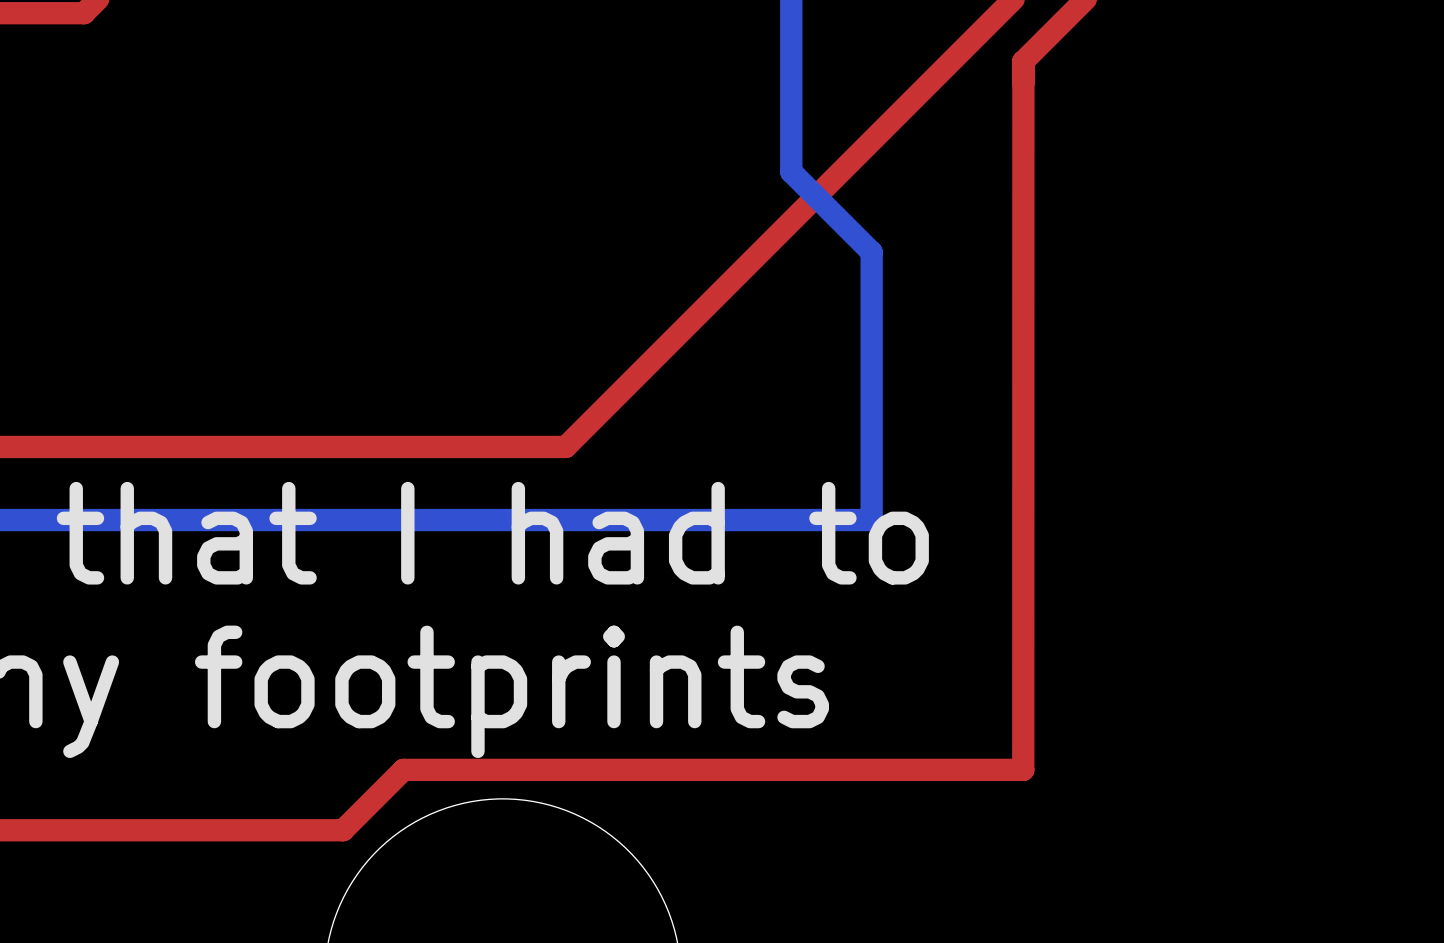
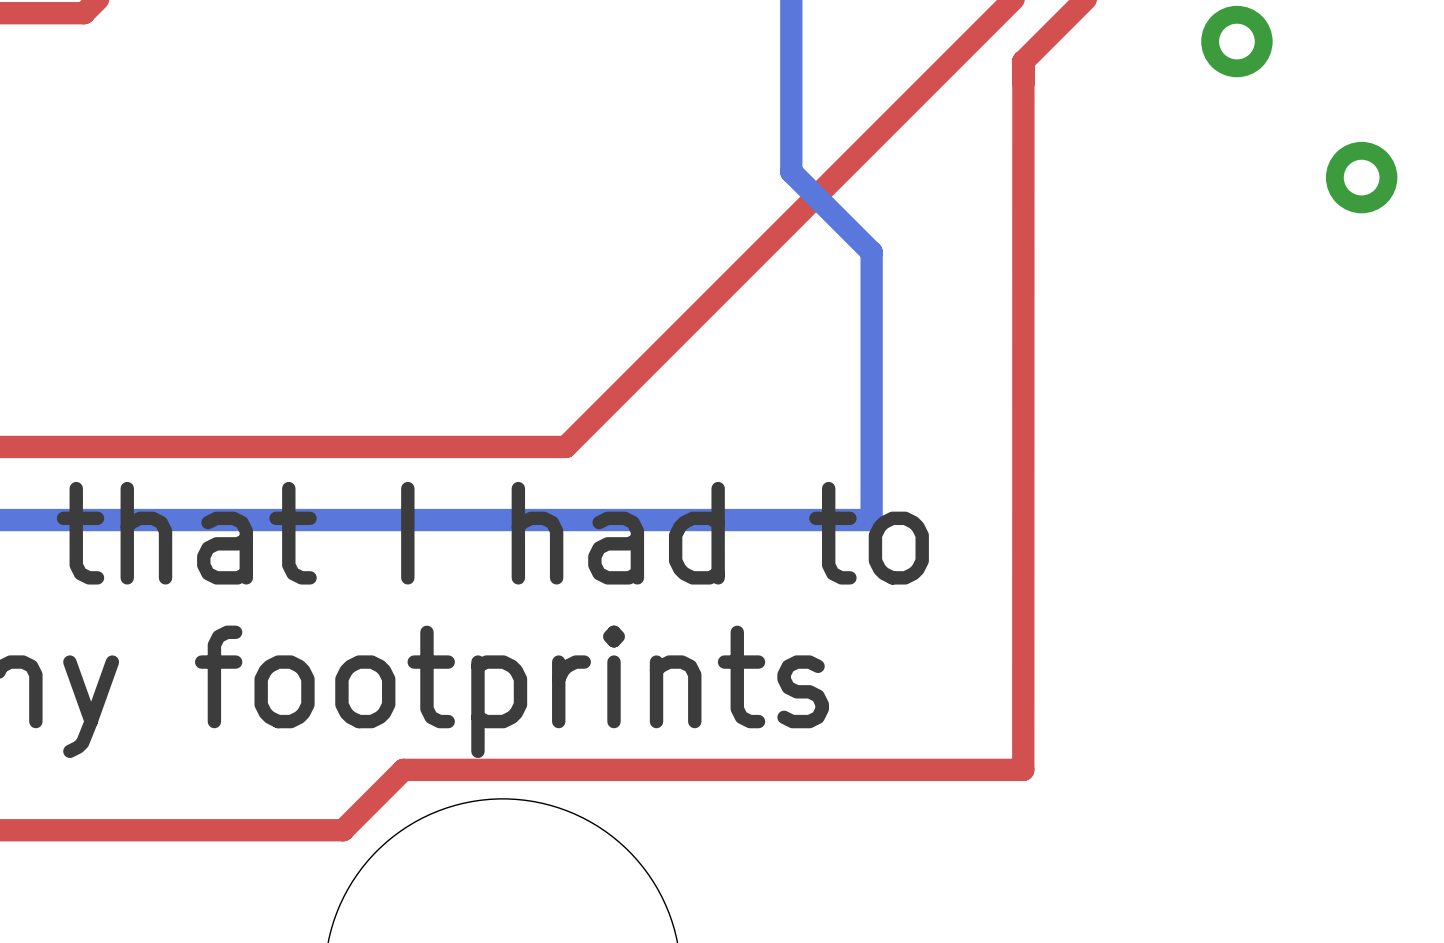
via: none -> (1236, 41)
via: none -> (1361, 177)

